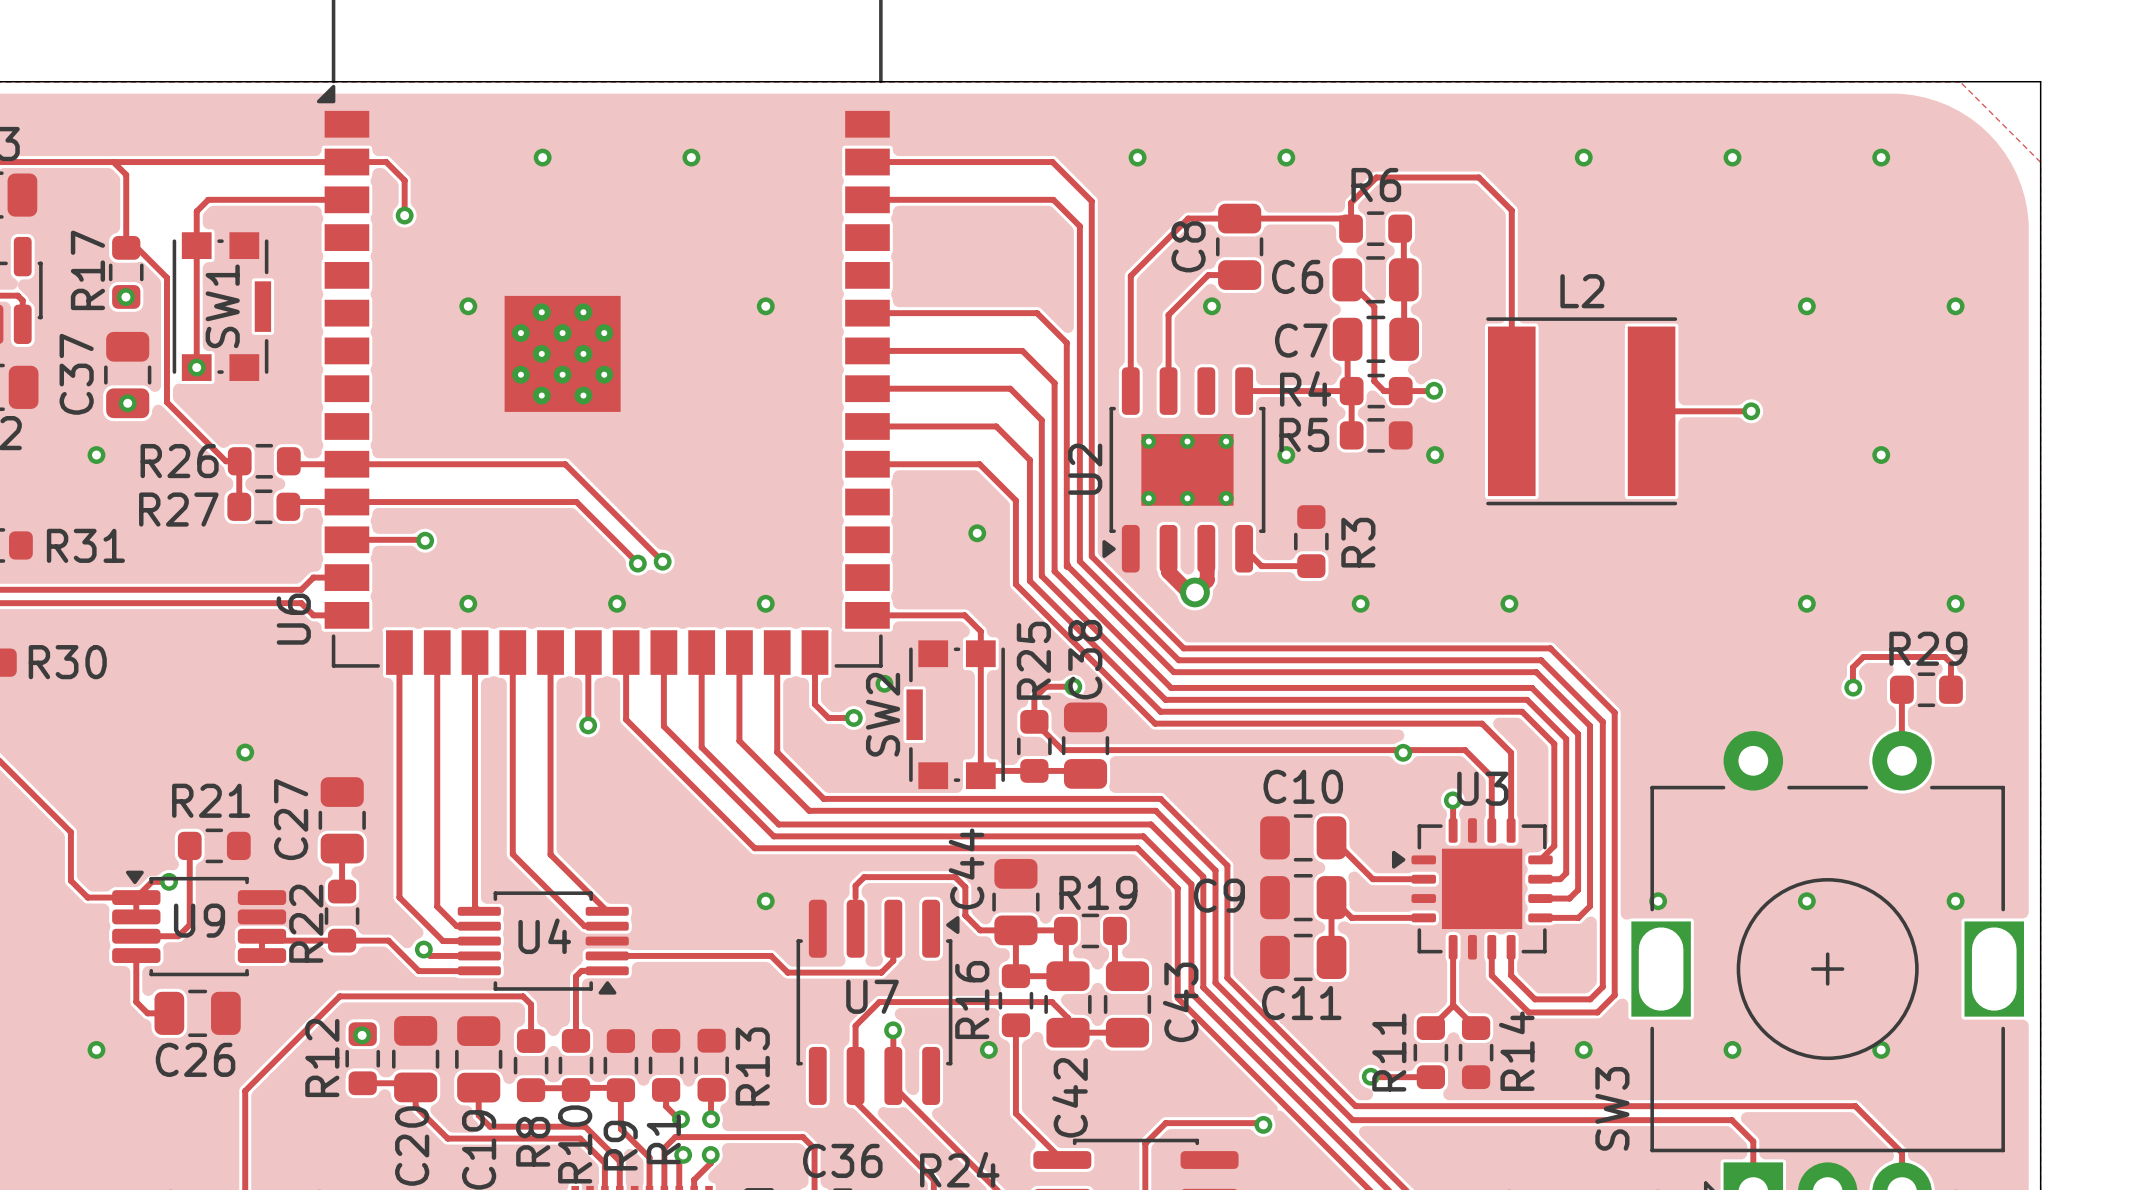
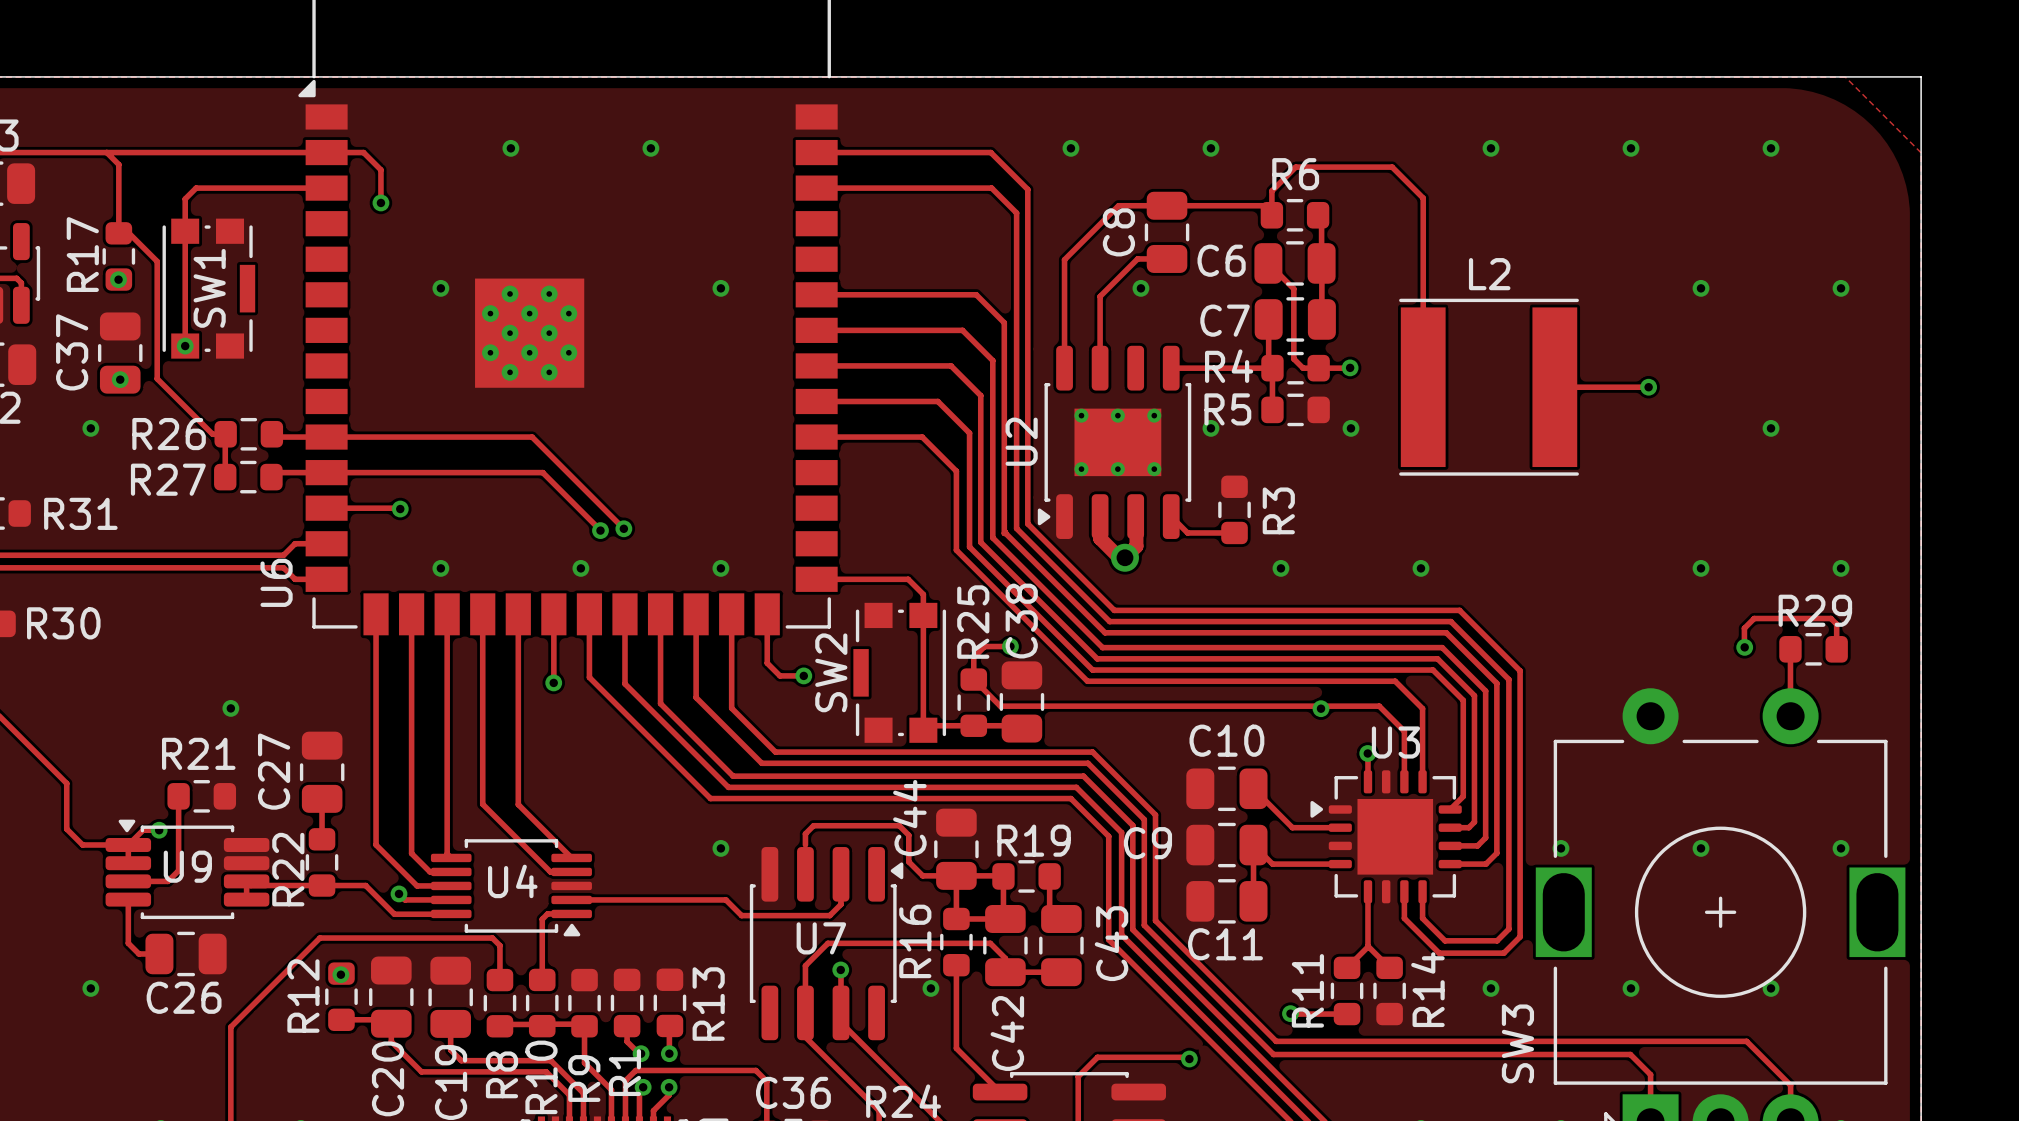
via: (977, 533) -> none
via: (884, 683) -> none

